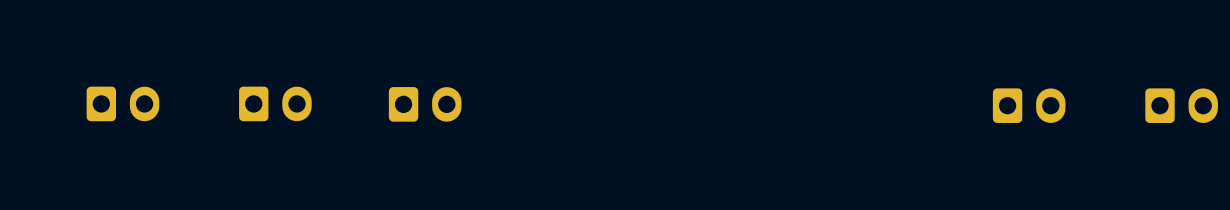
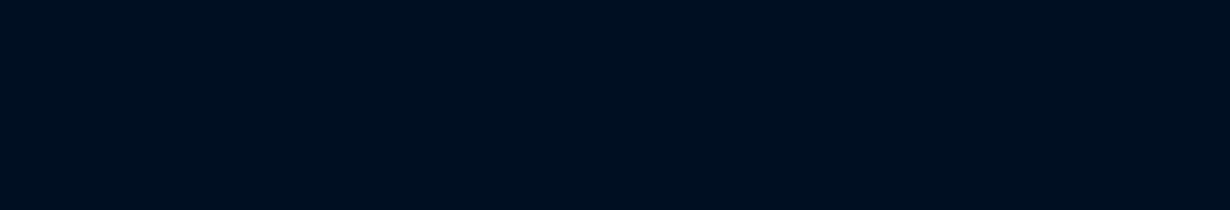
part: (122, 103) -> none
part: (275, 103) -> none
part: (425, 104) -> none
part: (1029, 105) -> none
part: (1181, 105) -> none

